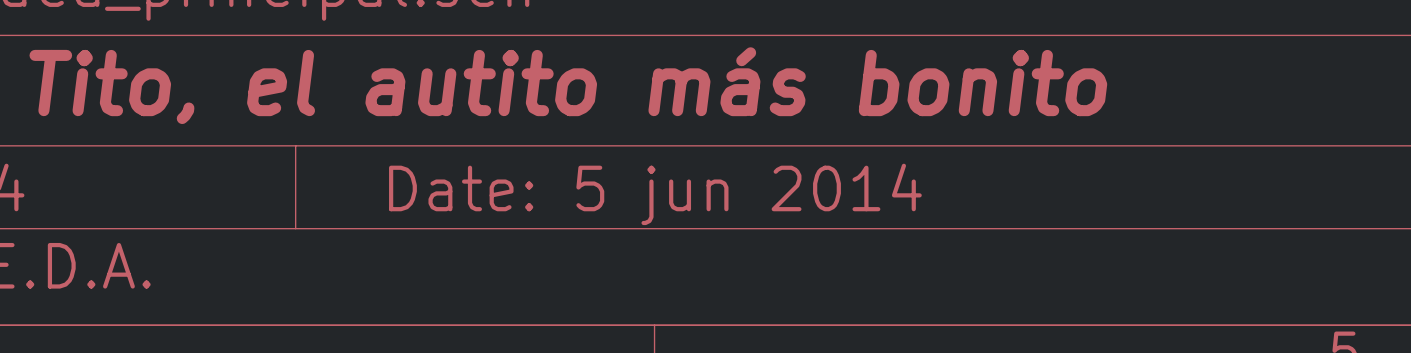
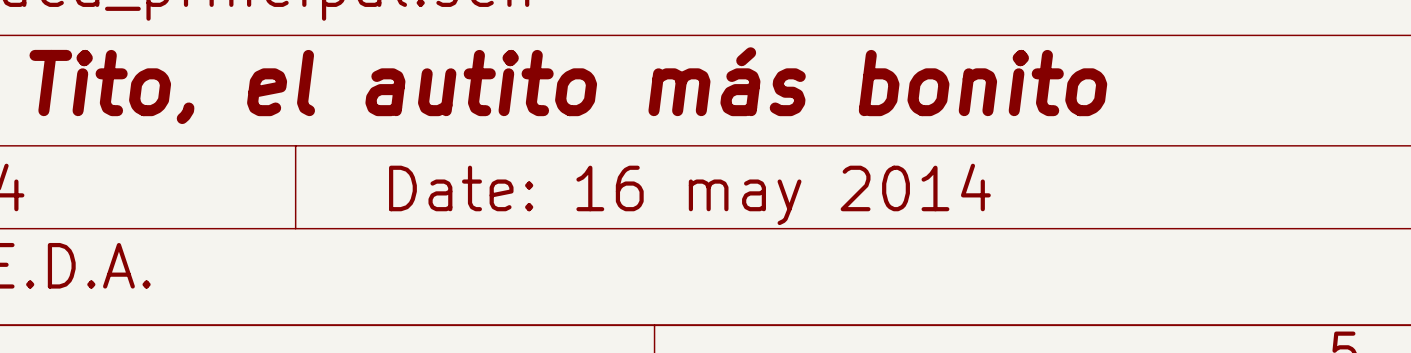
title block: Date: 5 jun 2014 (655, 194) -> Date: 16 may 2014 (689, 194)

